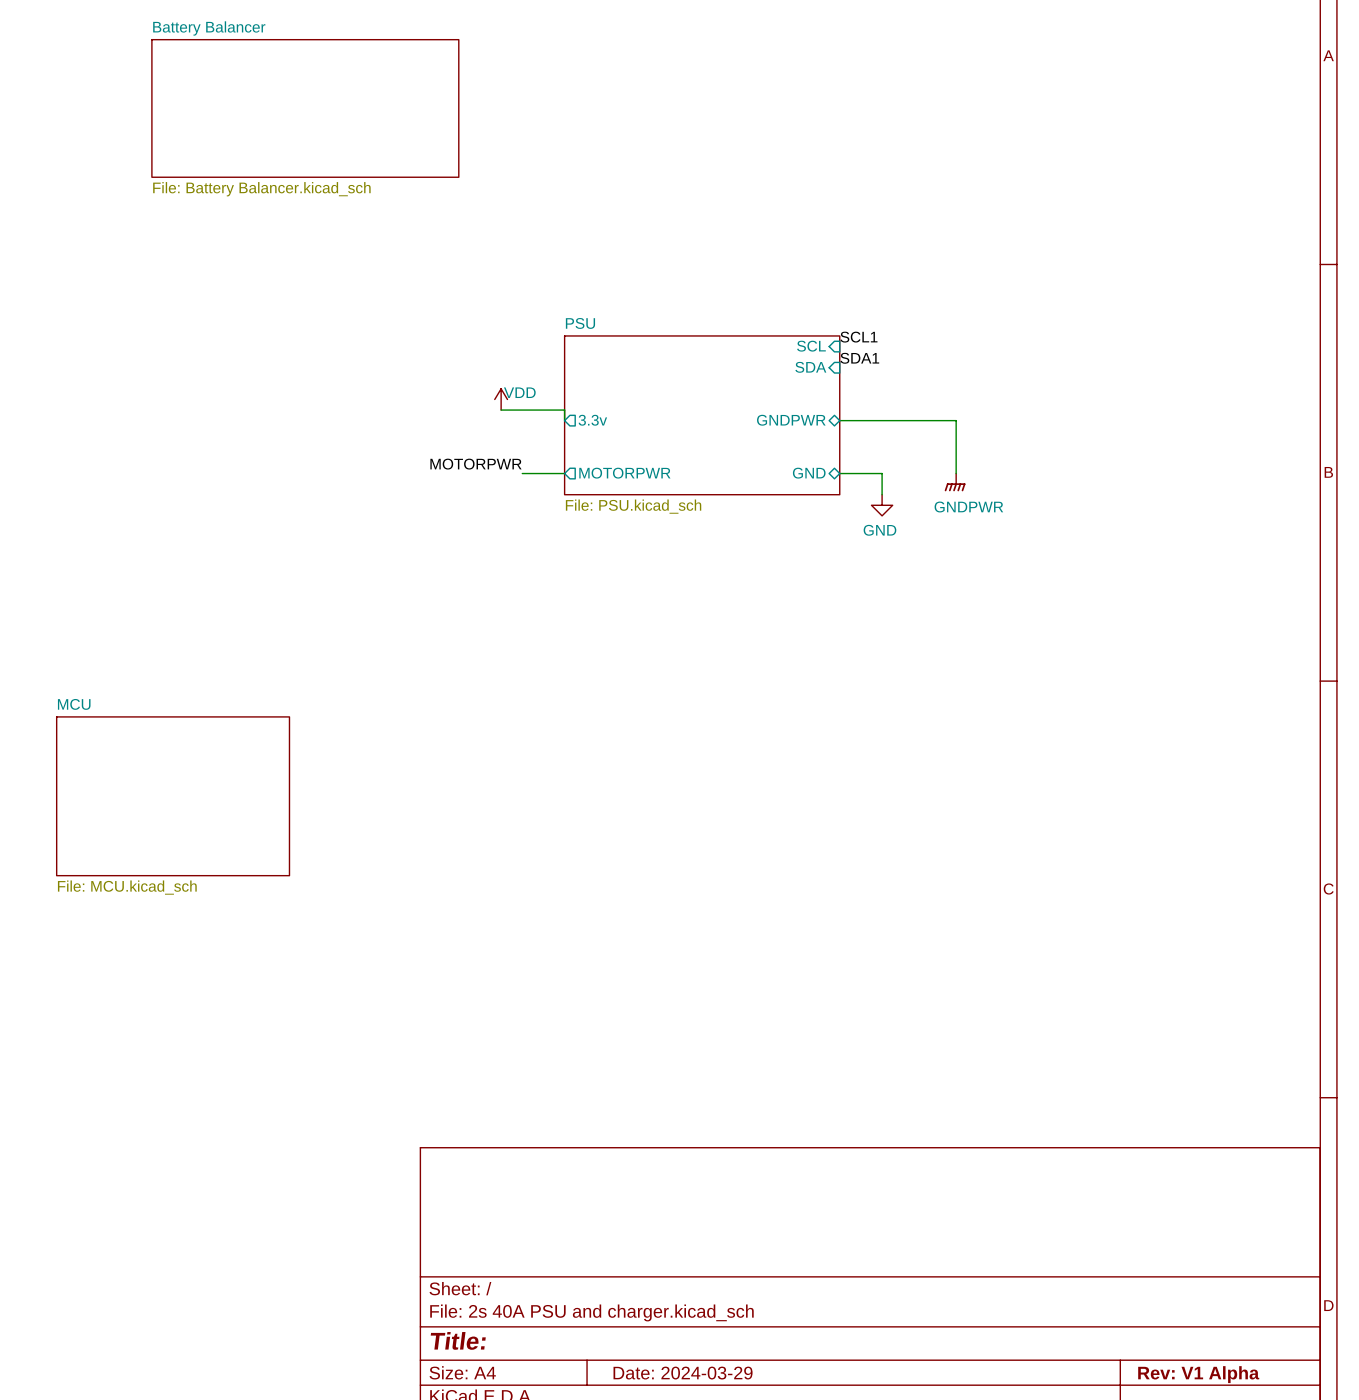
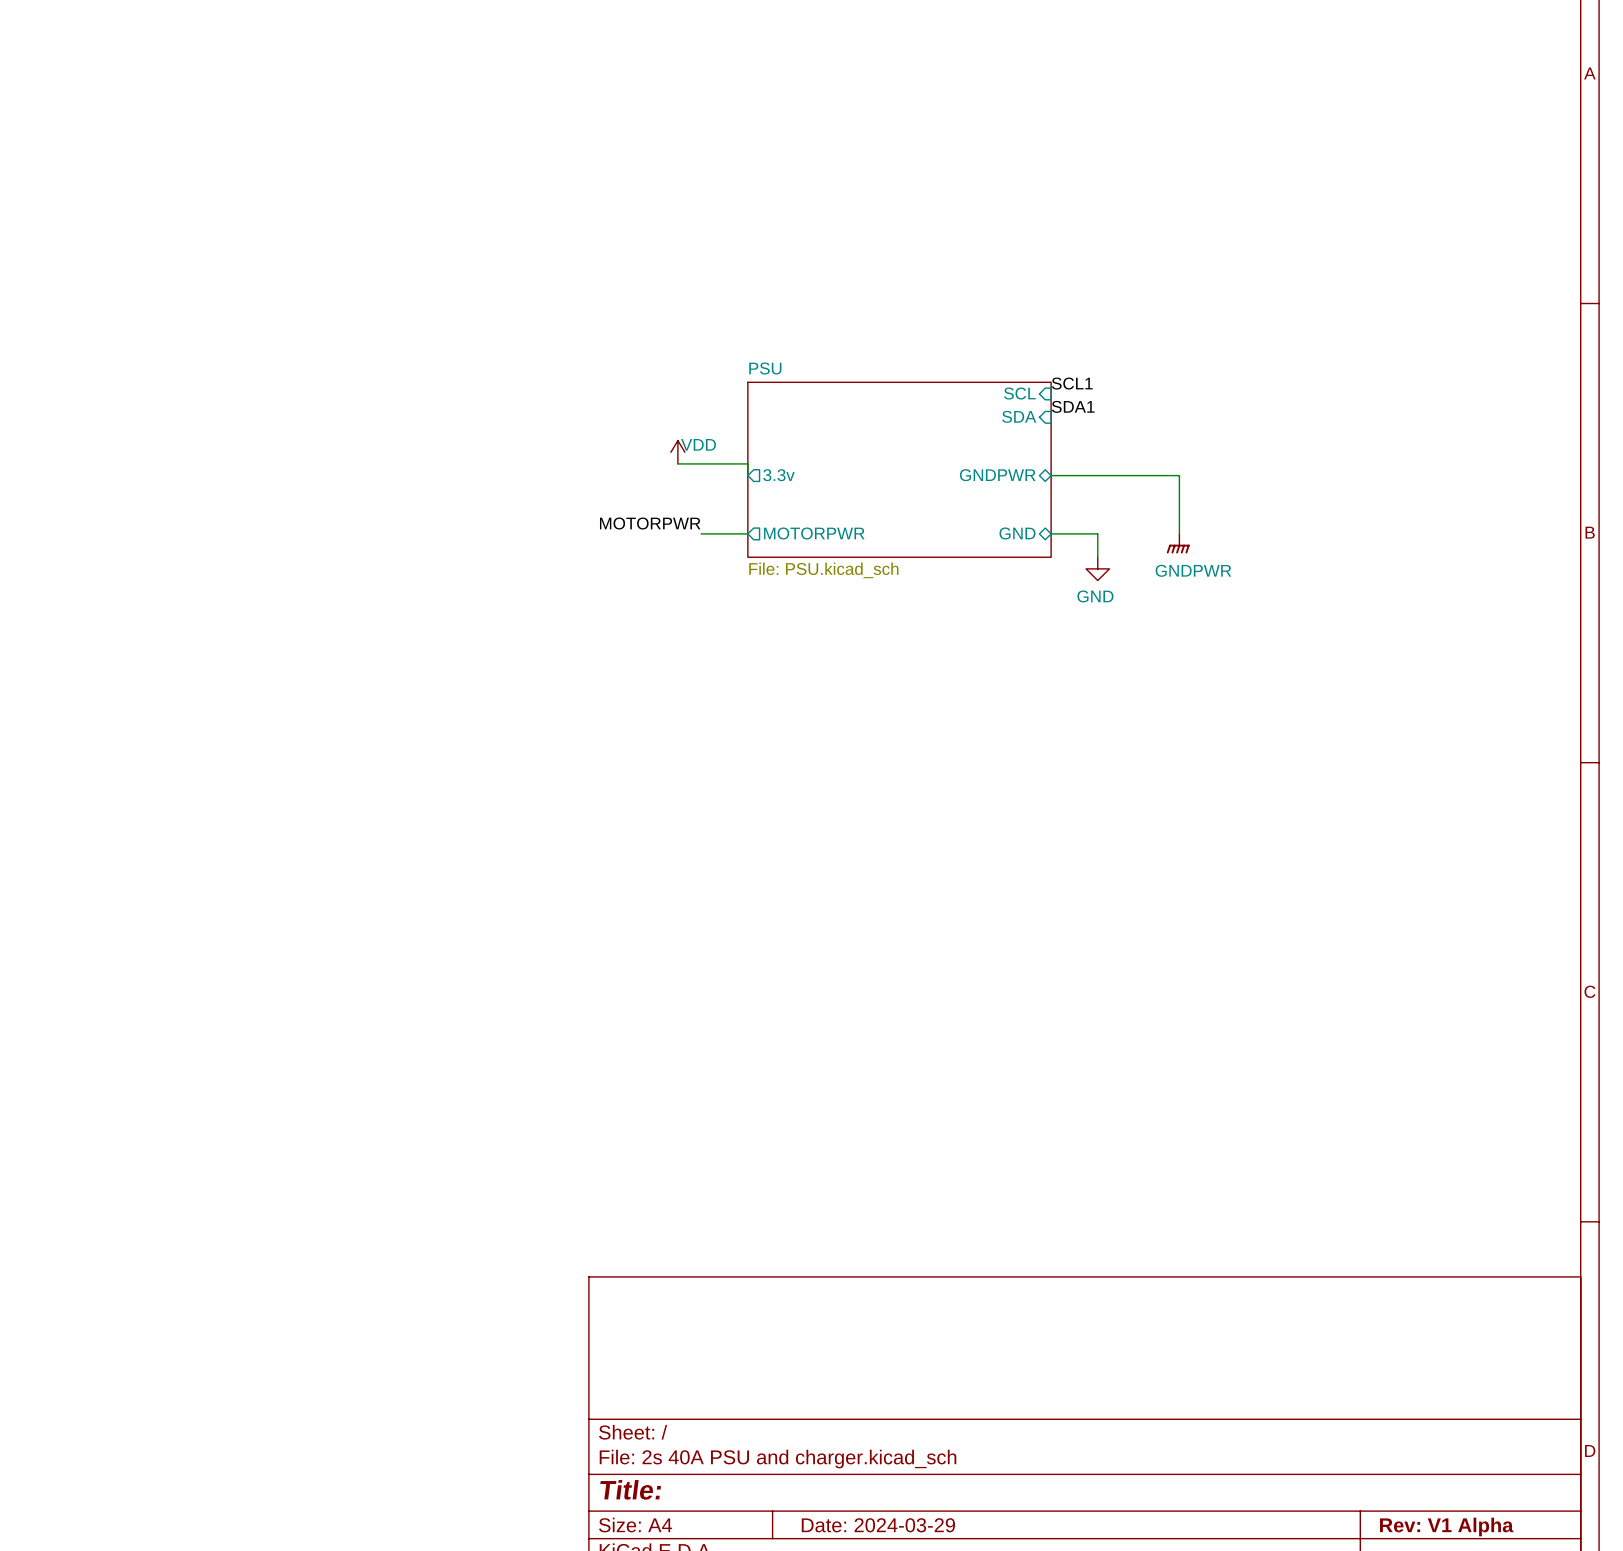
sheet Battery Balancer: File: Battery Balancer.kicad_sch (305, 108) -> none
sheet MCU: File: MCU.kicad_sch (173, 796) -> none

